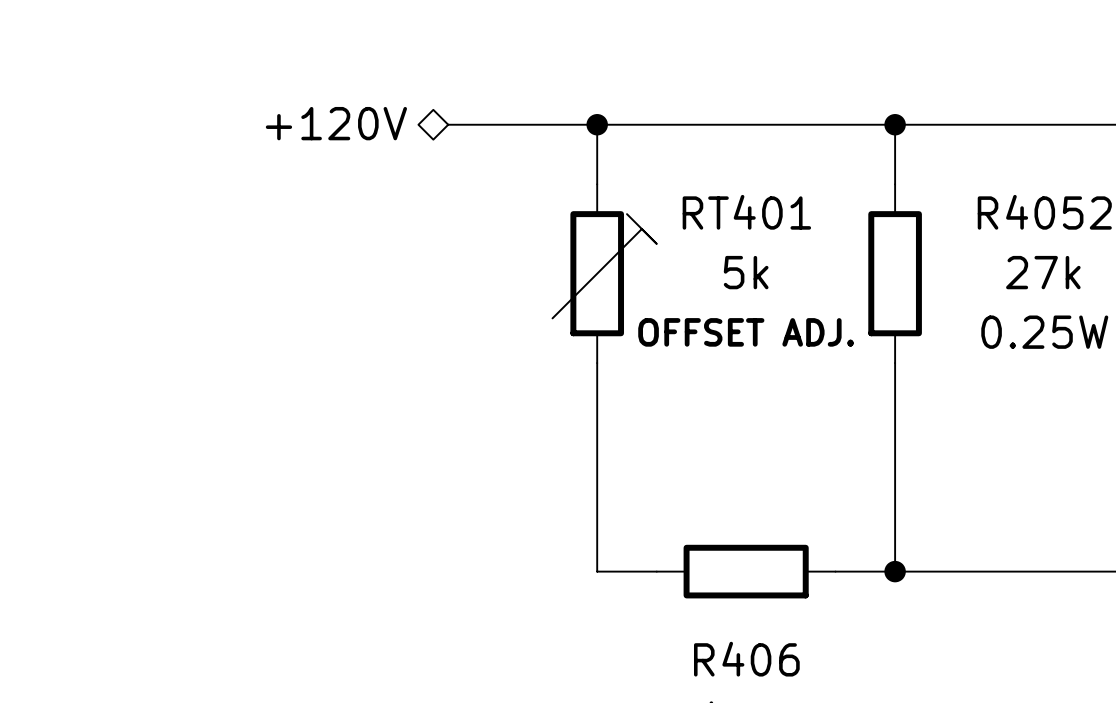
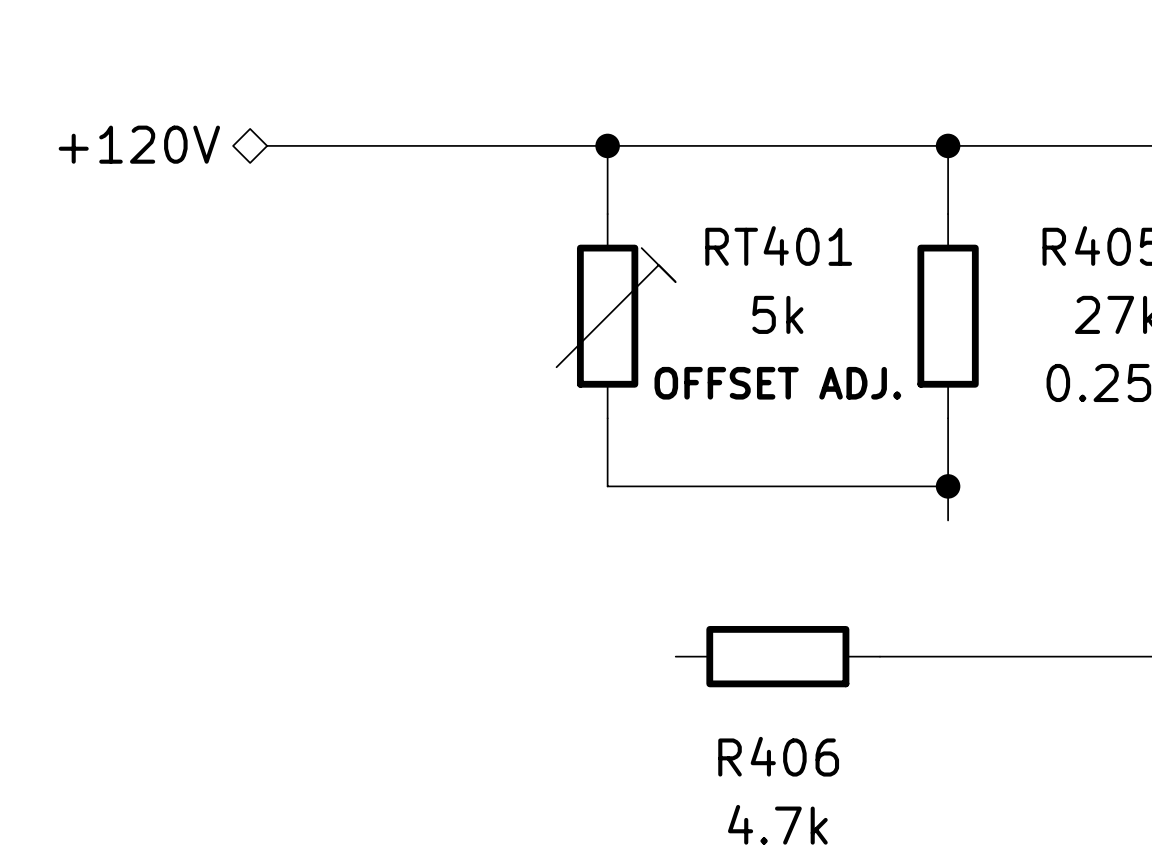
hierarchical label position: +120V (336, 123) -> +120V (139, 144)
wire: none -> (267, 145) (437, 145)
wire: (597, 422) (597, 571) (656, 571) -> (607, 486) (948, 486)
junction: none -> (948, 486)
wire: (895, 452) (895, 571) -> none
junction: (895, 571) -> none

